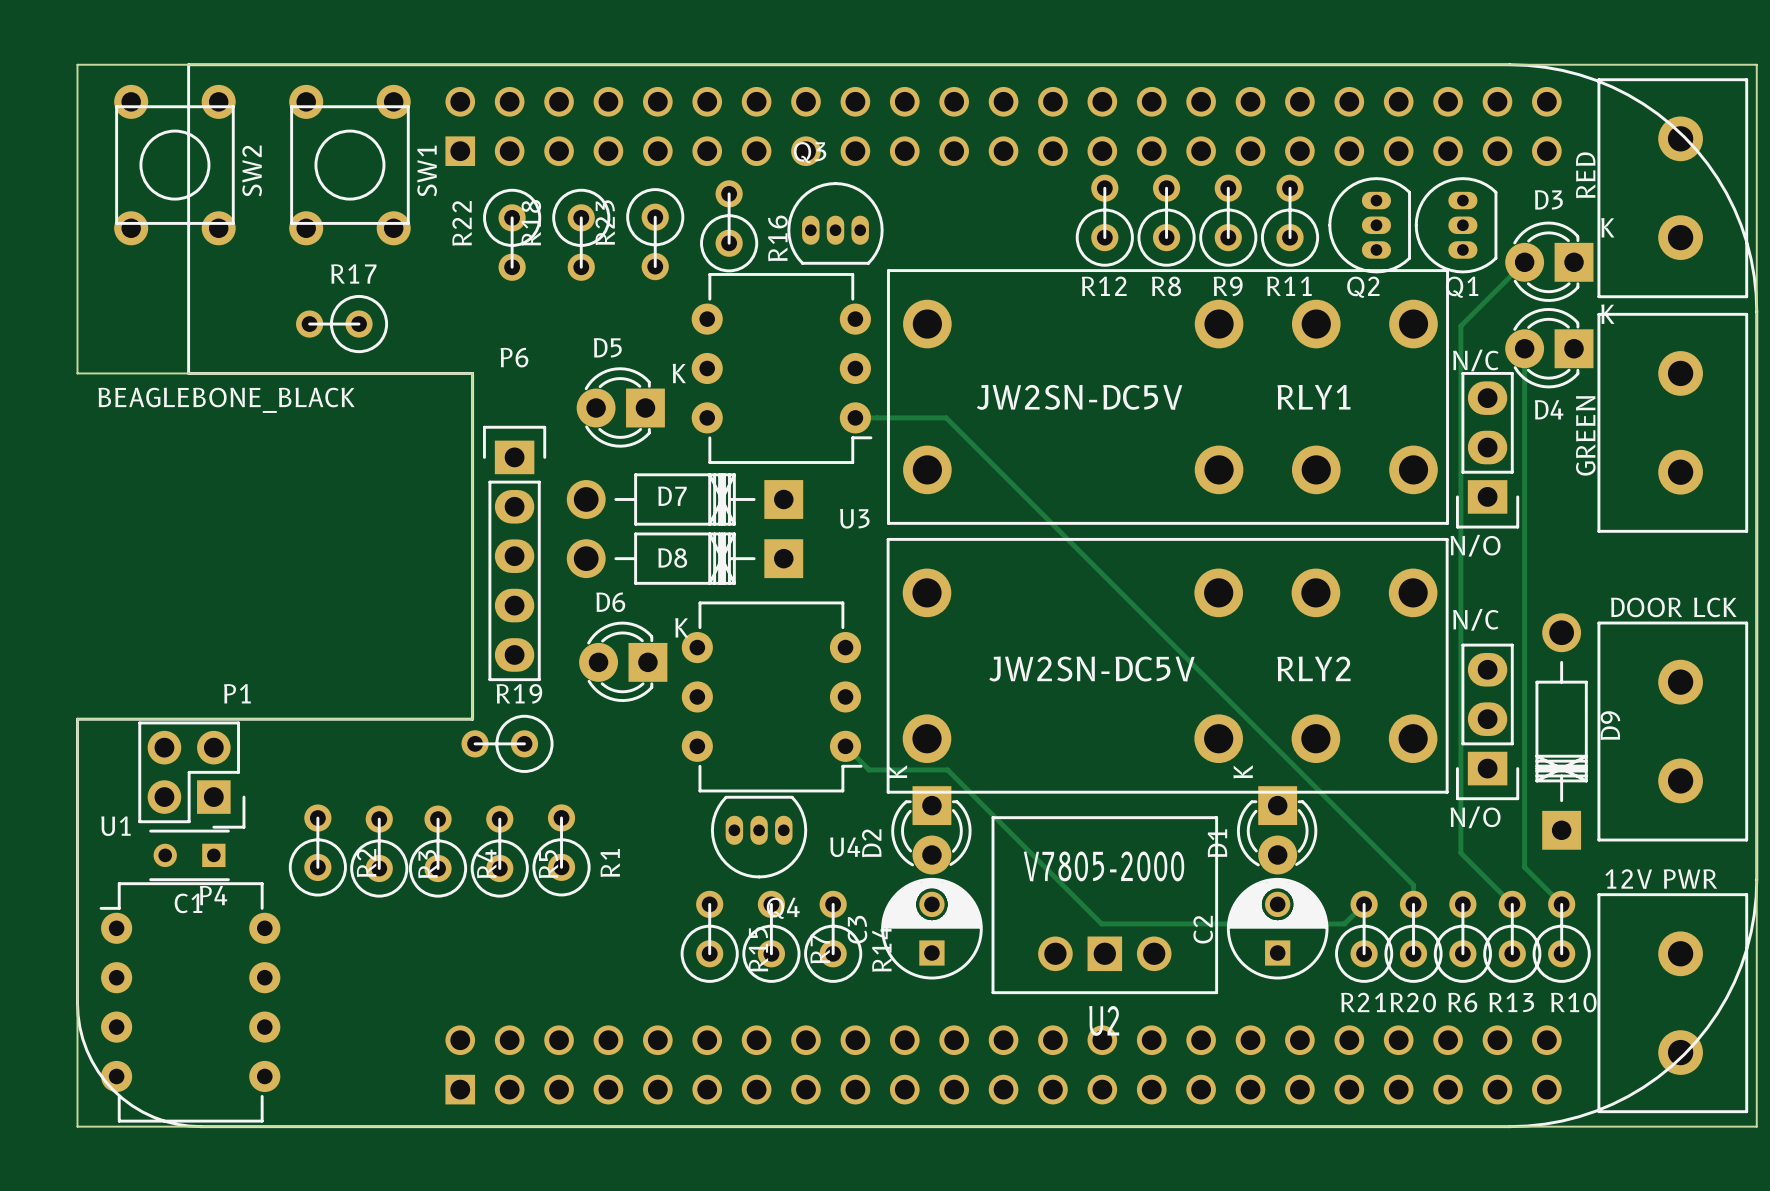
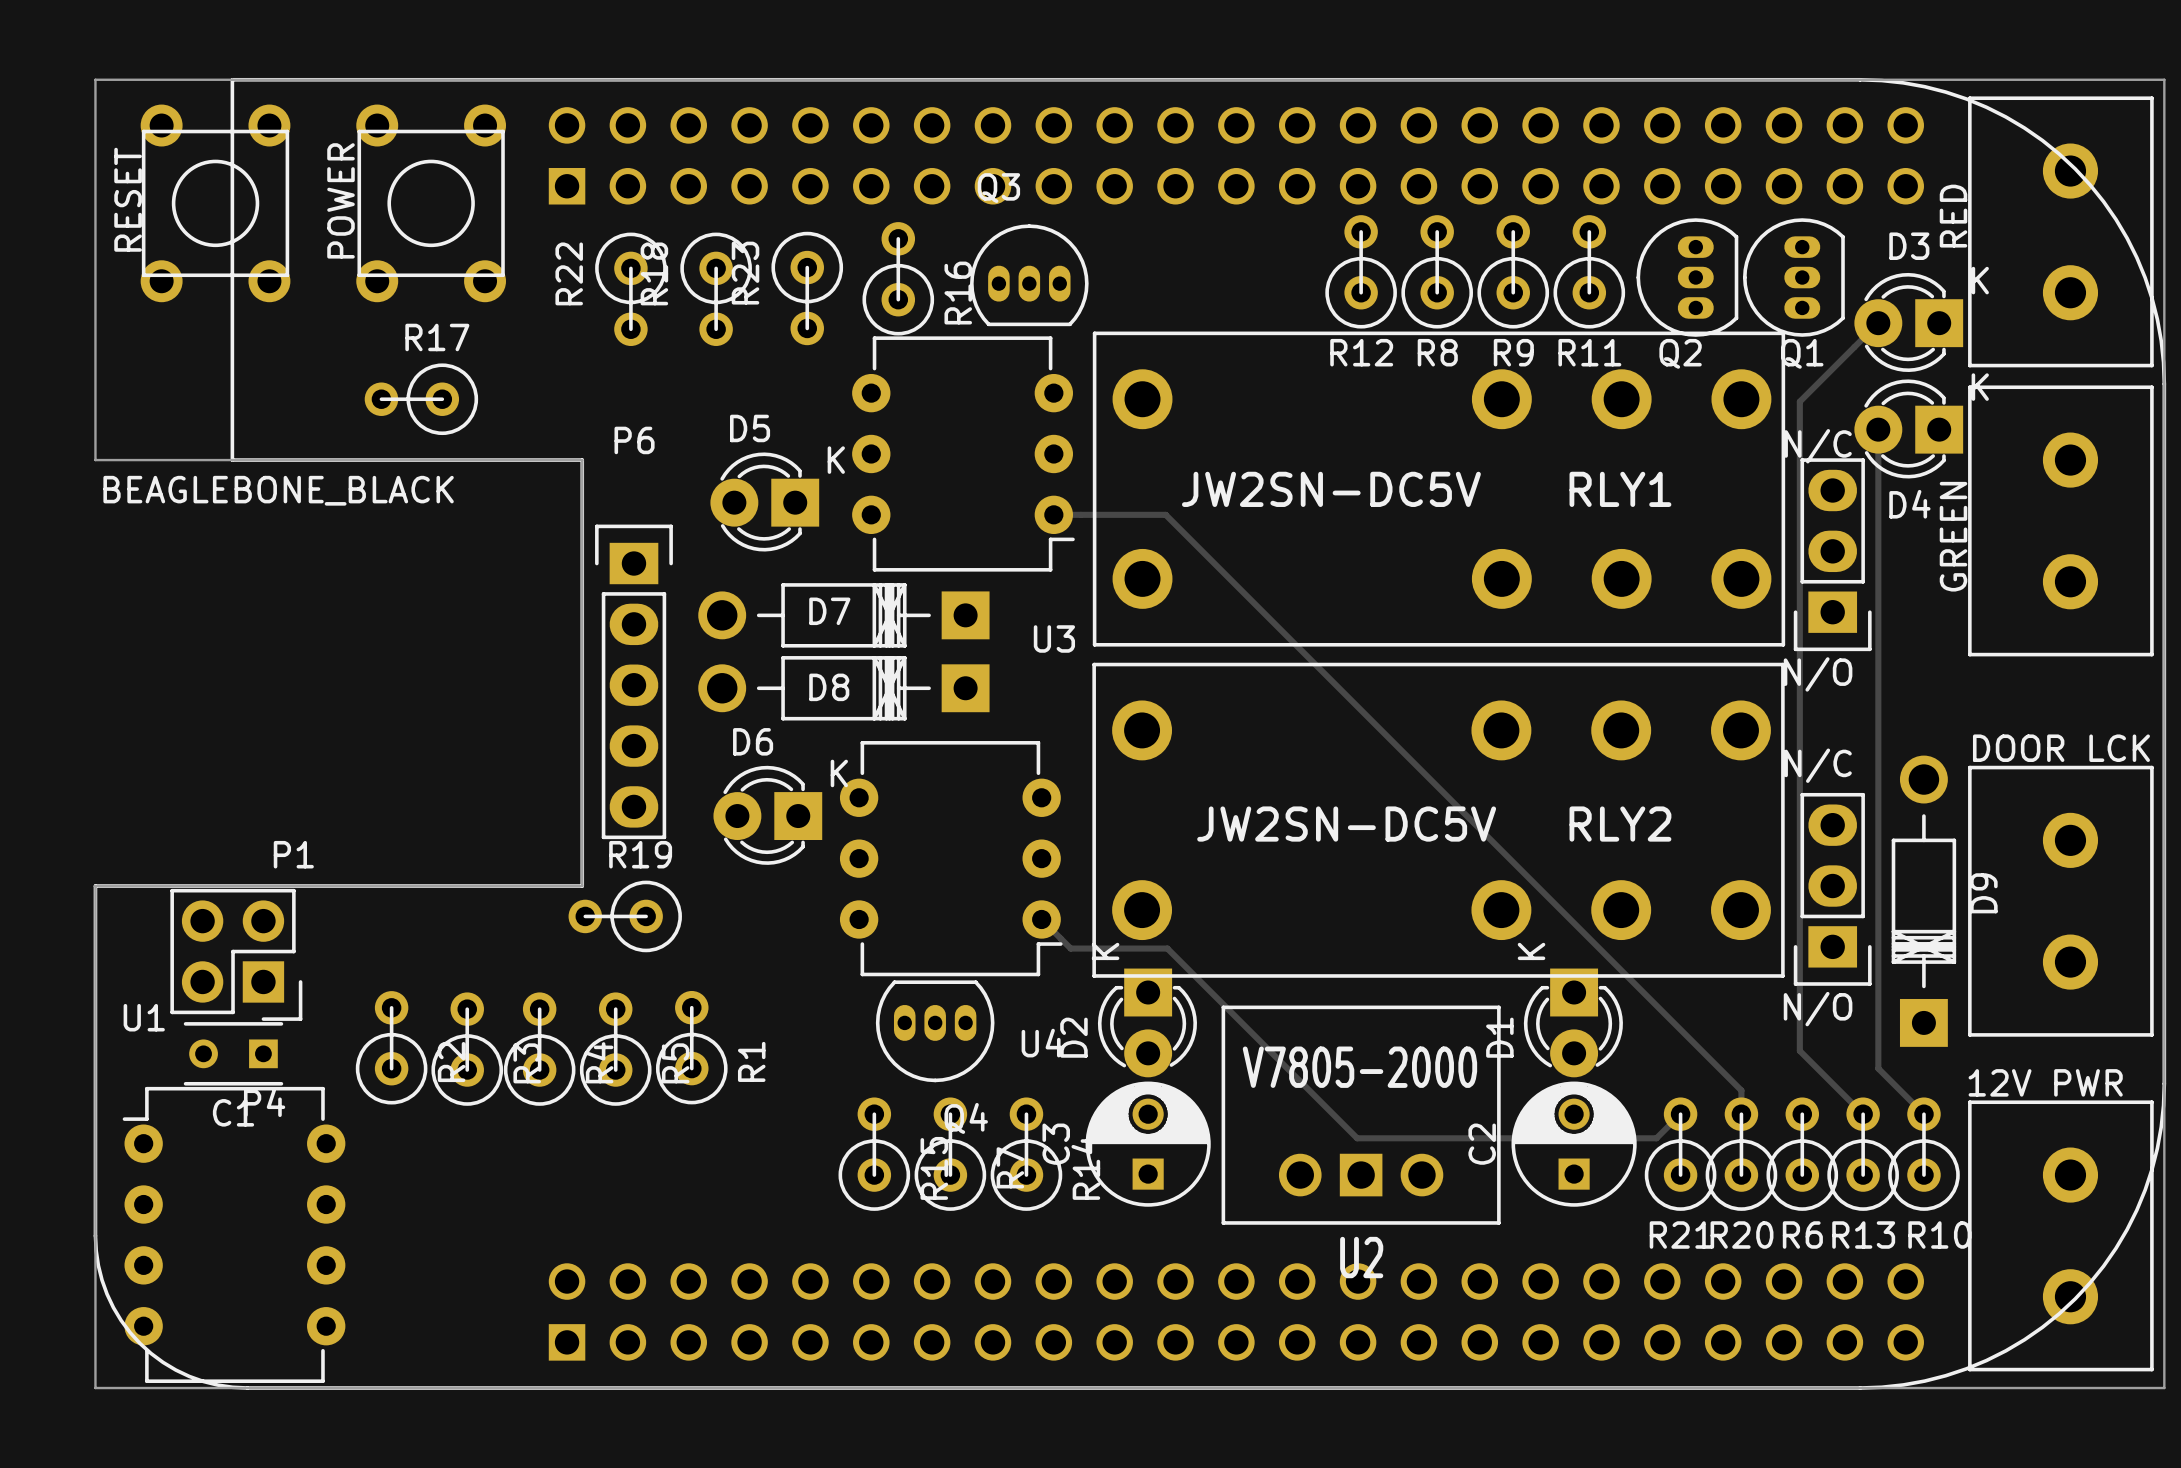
SW2 name: SW2 (252, 170) -> RESET (128, 199)
SW1 name: SW1 (427, 171) -> POWER (341, 200)

